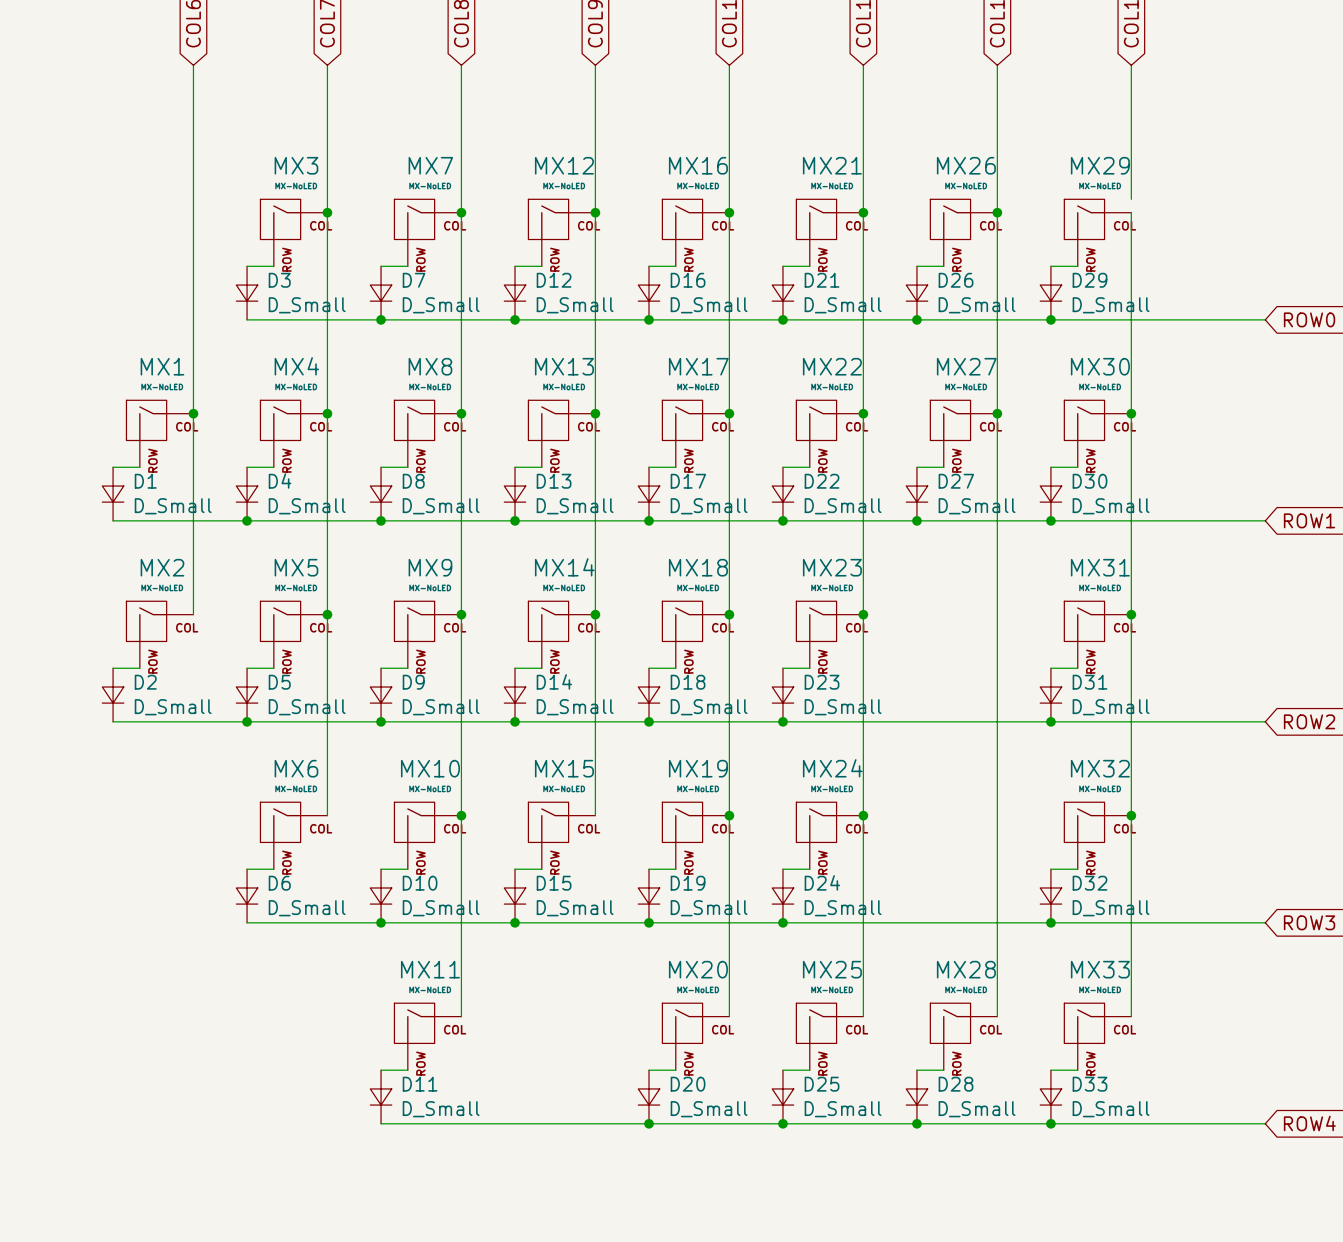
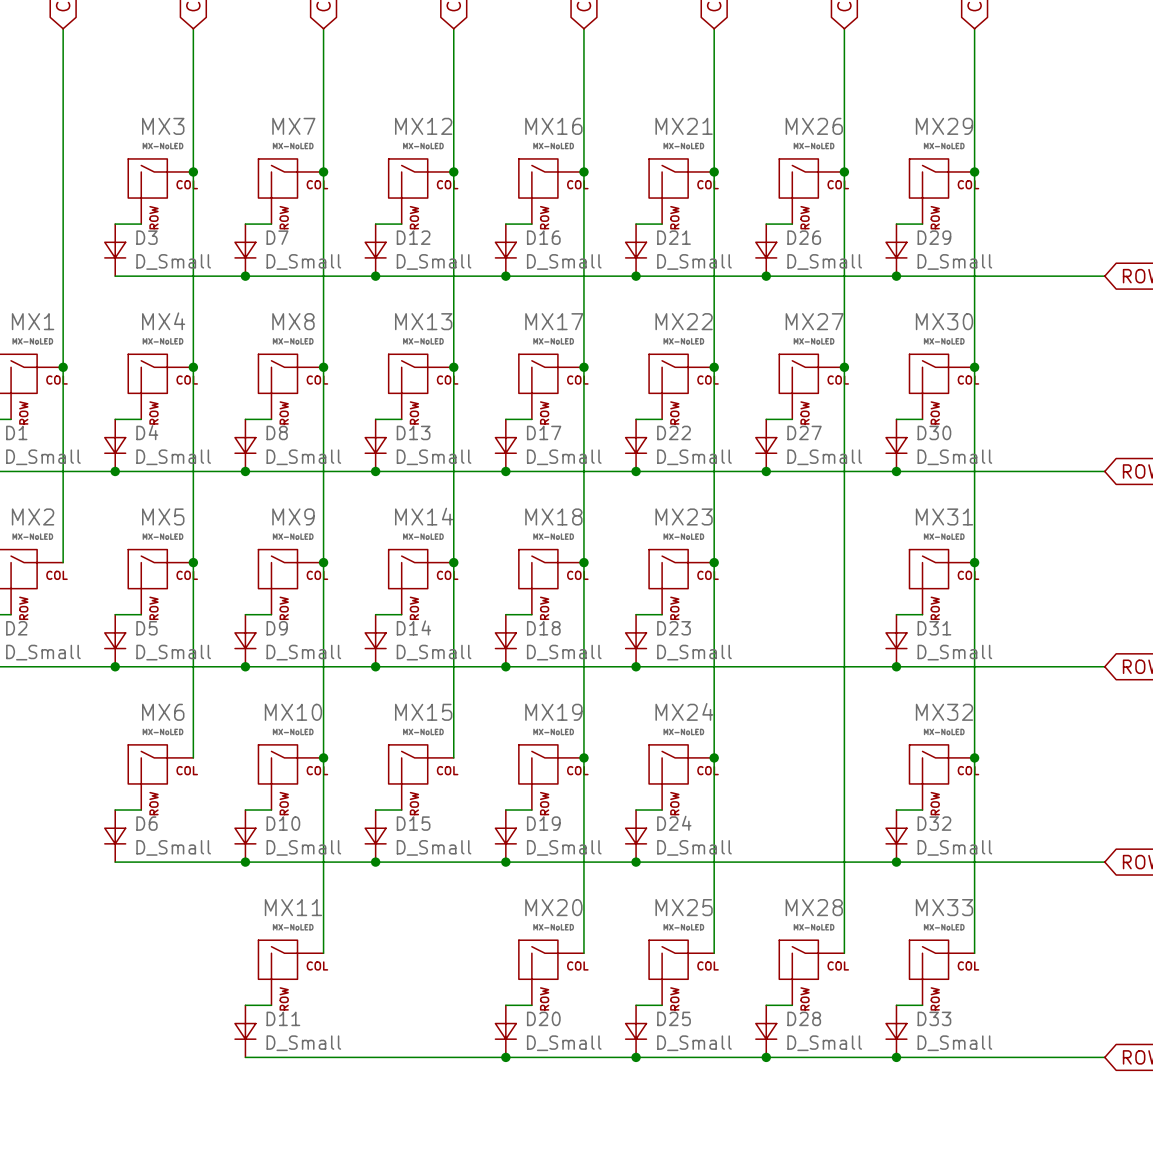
wire: none -> (974, 158) (974, 171)
junction: none -> (974, 171)

